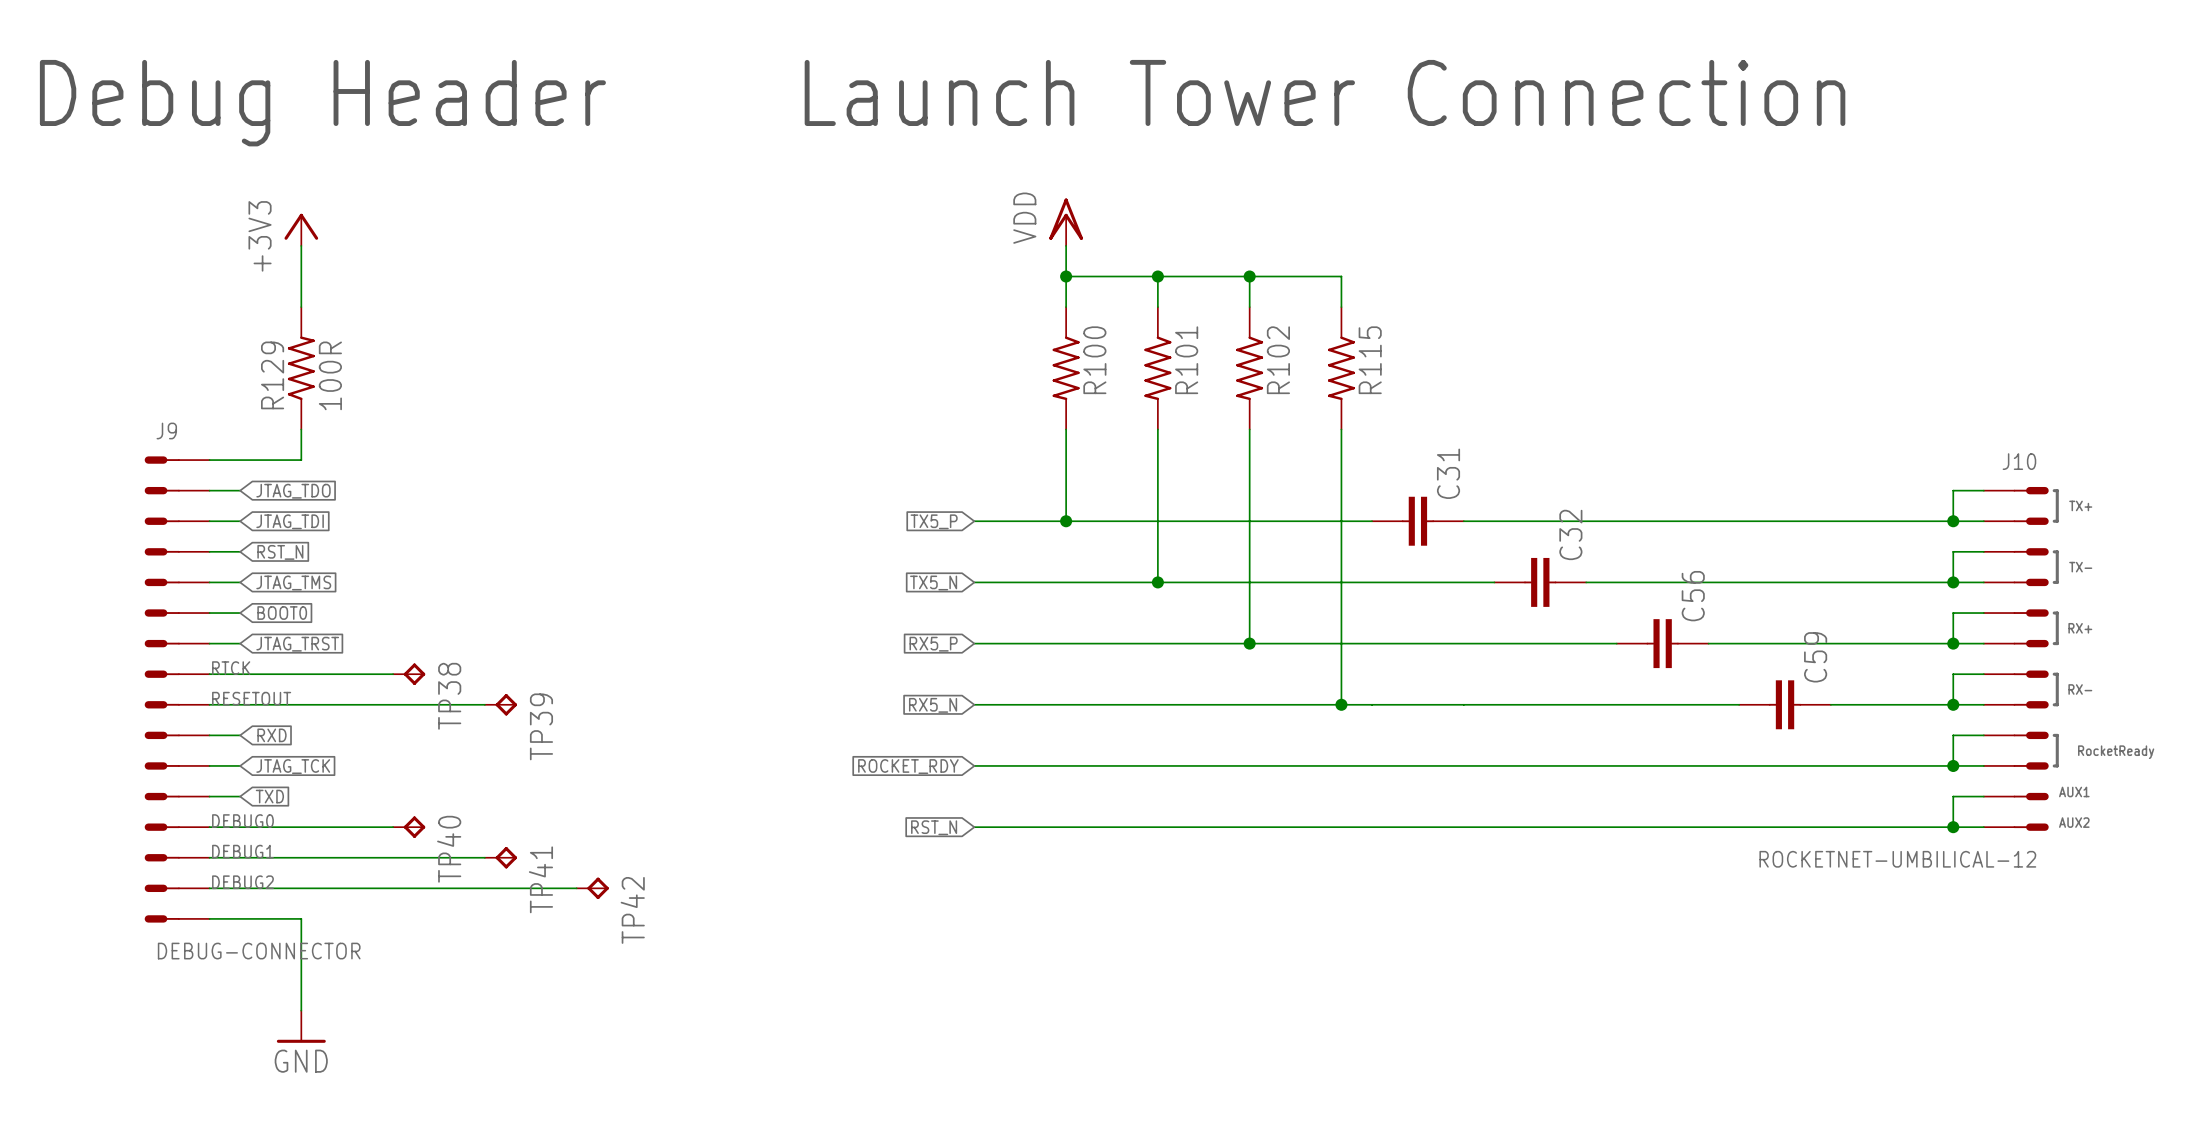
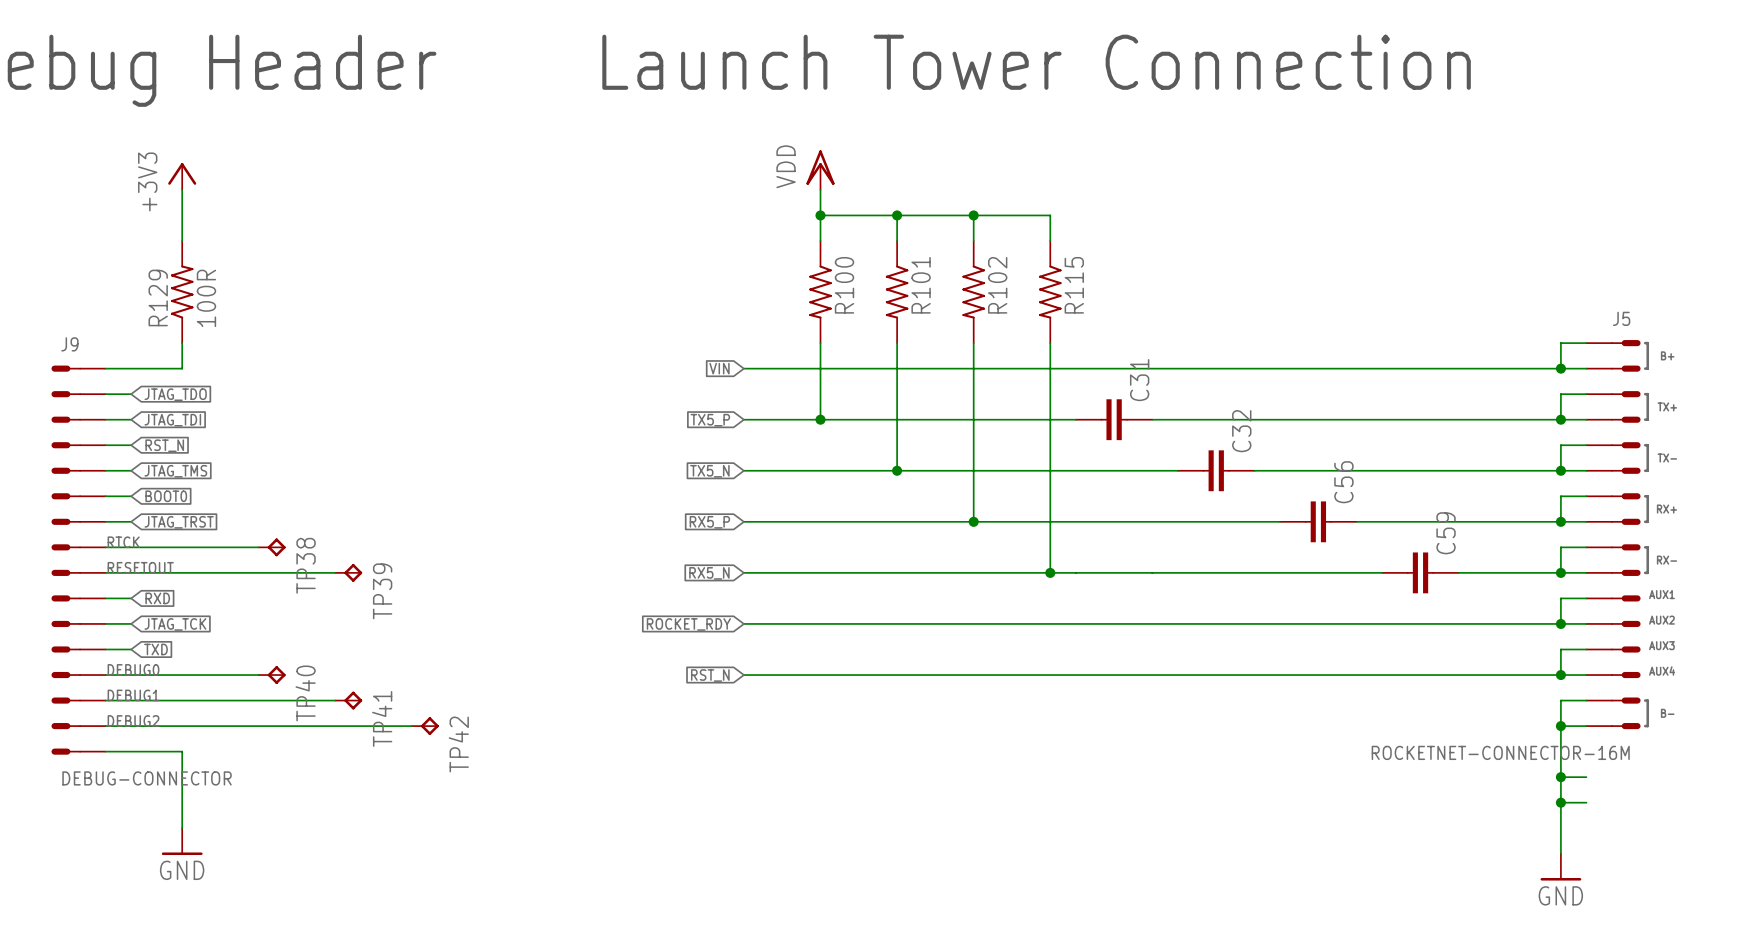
wire: none -> (1586, 343) (1560, 343) (1560, 368)
global label: none -> VIN (719, 368)
wire: none -> (743, 368) (1586, 368)
junction: none -> (1560, 368)
J10: ROCKETNET-UMBILICAL-12 (2021, 658) -> none
J5: none -> ROCKETNET-CONNECTOR-16M (1617, 534)
wire: none -> (1586, 700) (1560, 700) (1560, 853)
wire: none -> (1560, 726) (1586, 726)
junction: none -> (1560, 726)
wire: none -> (1560, 777) (1586, 777)
junction: none -> (1560, 777)
wire: none -> (1560, 802) (1586, 802)
junction: none -> (1560, 802)
power symbol: none -> GND (1560, 867)

